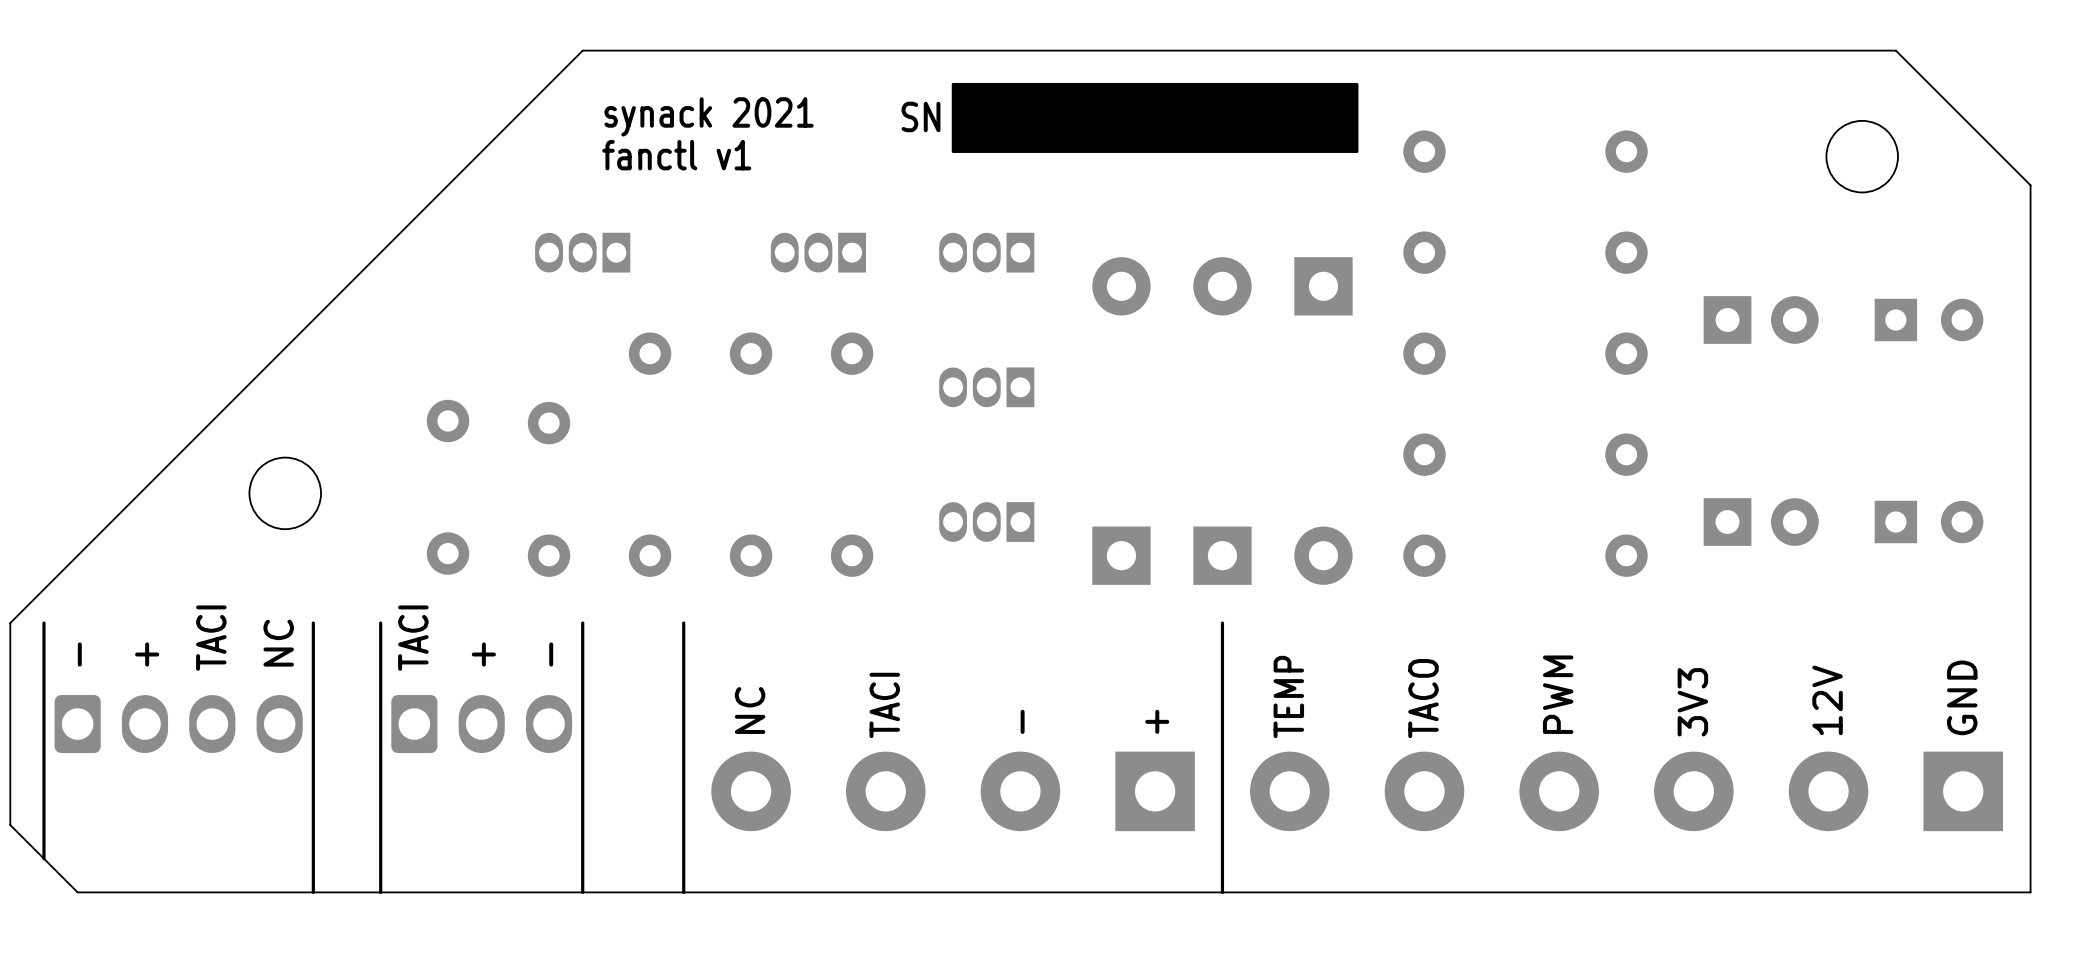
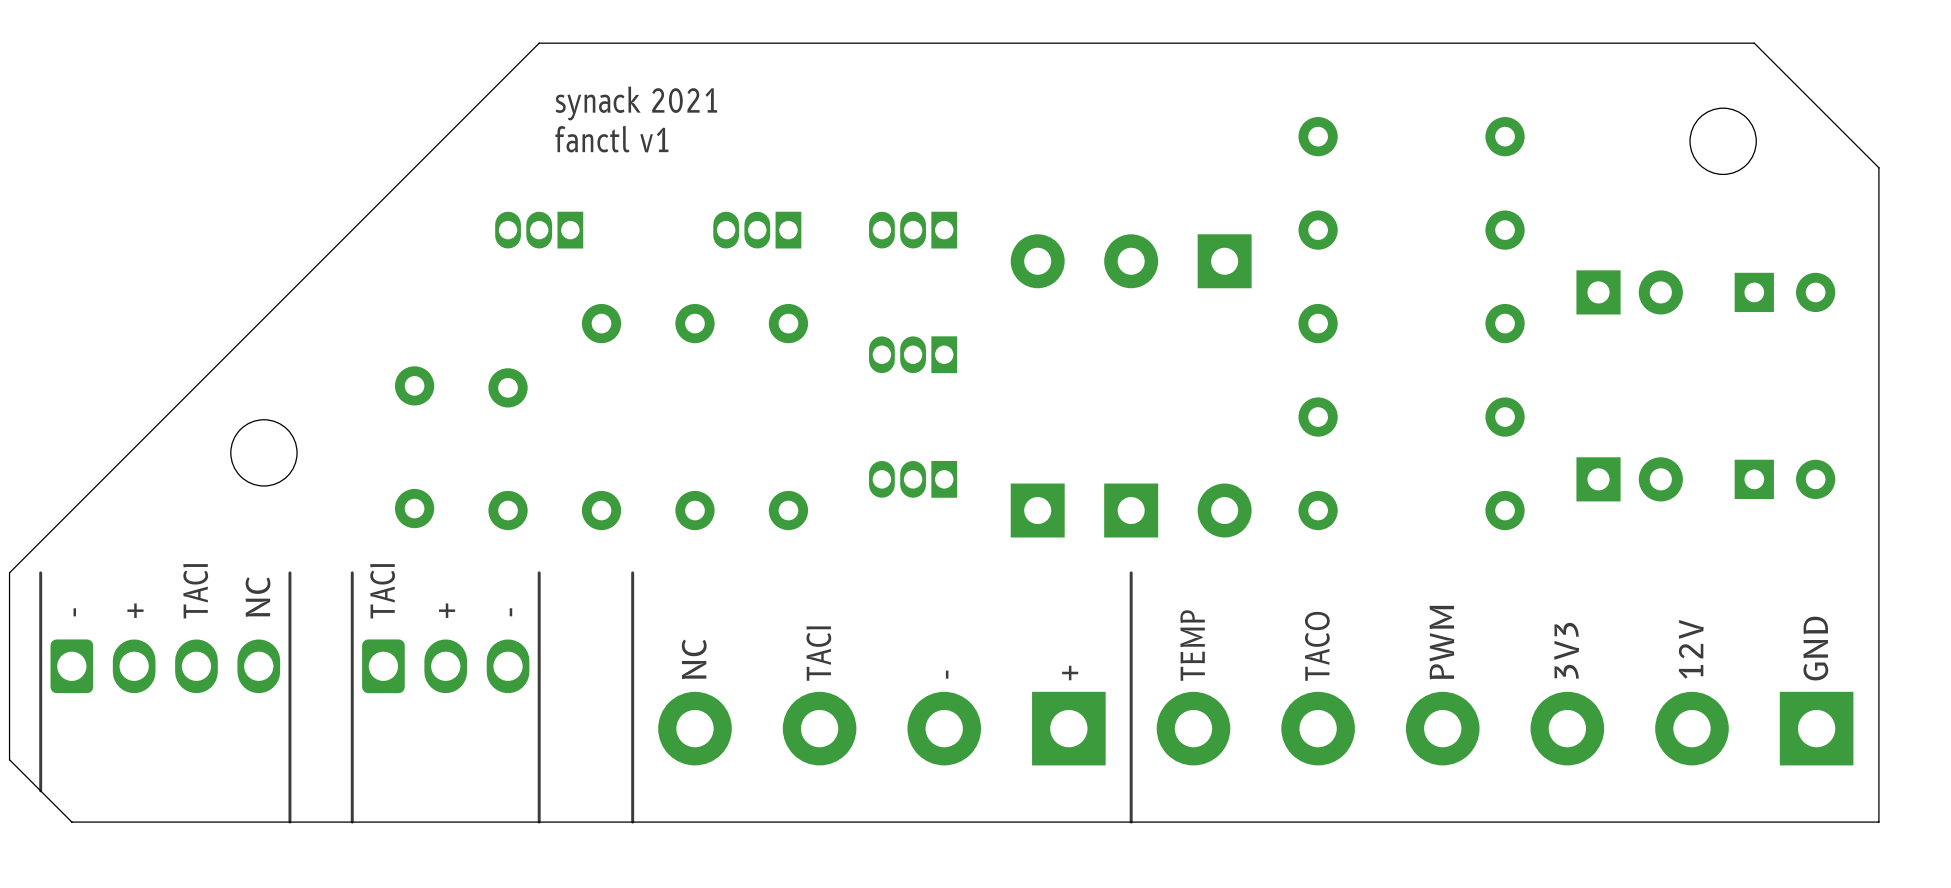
drawing: [951, 82, 1359, 153] -> none
text: SN (920, 116) -> none

